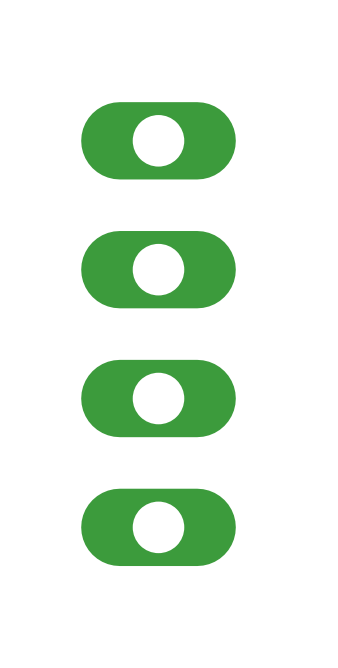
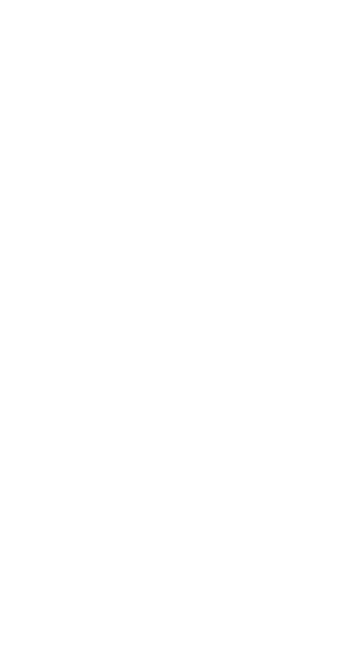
part: (158, 334) -> none

